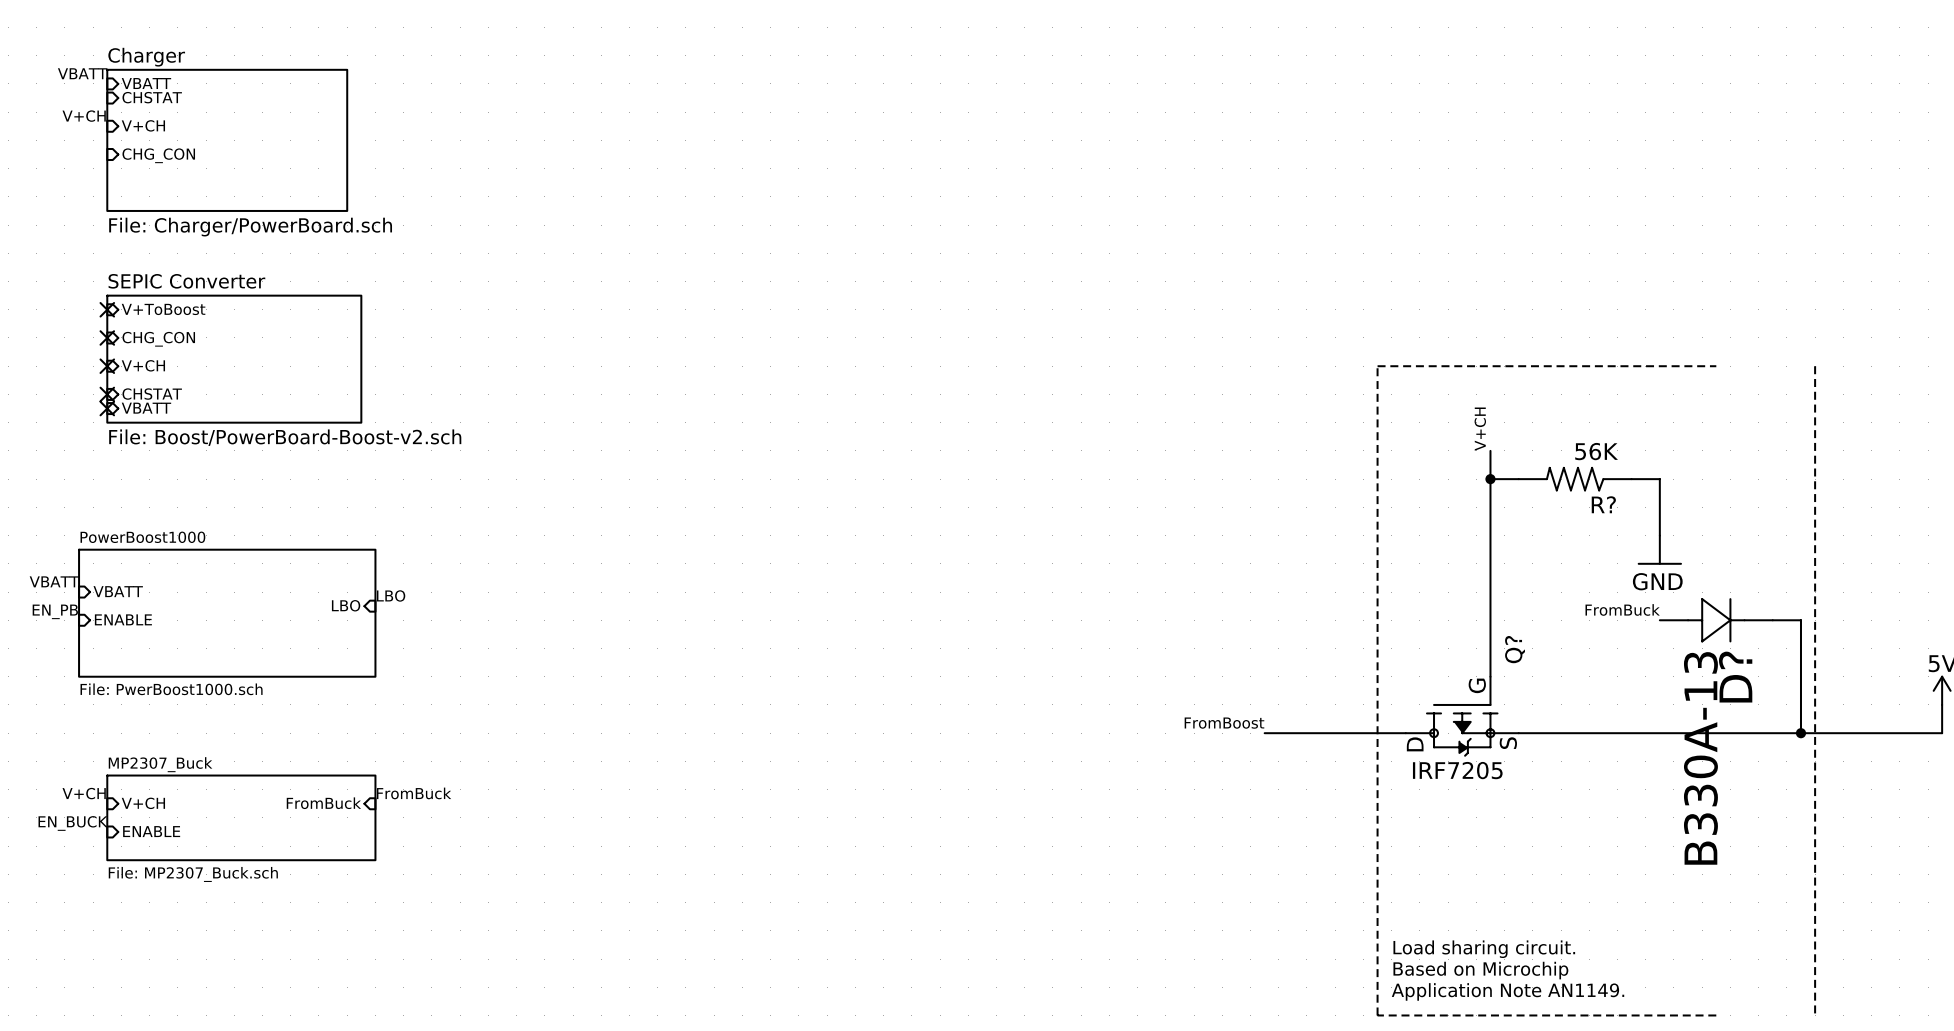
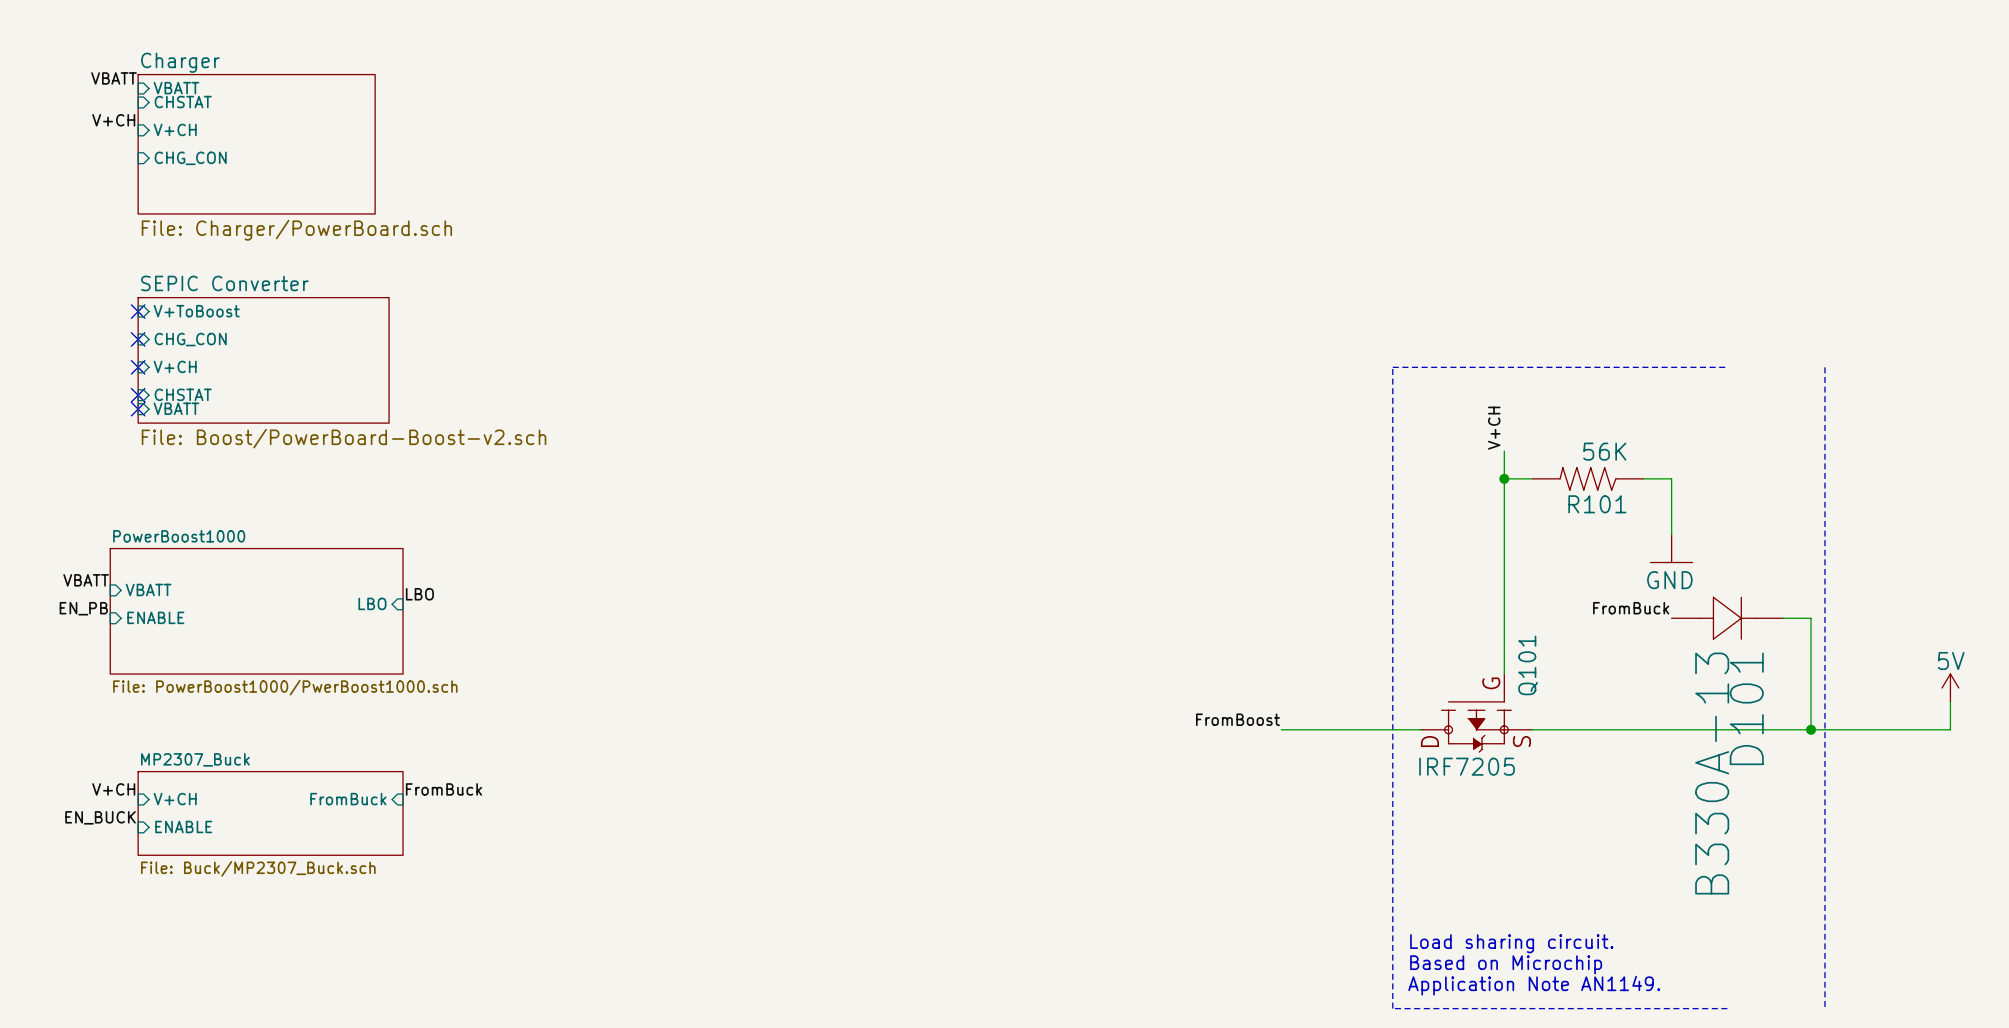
R? name: R? (1603, 504) -> R101 (1597, 504)
Q? name: Q? (1515, 649) -> Q101 (1528, 665)
D? name: D? (1735, 677) -> D101 (1746, 708)
sheet PowerBoost1000 value: File: PwerBoost1000.sch (171, 689) -> File: PowerBoost1000/PwerBoost1000.sch (285, 687)
sheet MP2307_Buck value: File: MP2307_Buck.sch (193, 874) -> File: Buck/MP2307_Buck.sch (258, 868)

